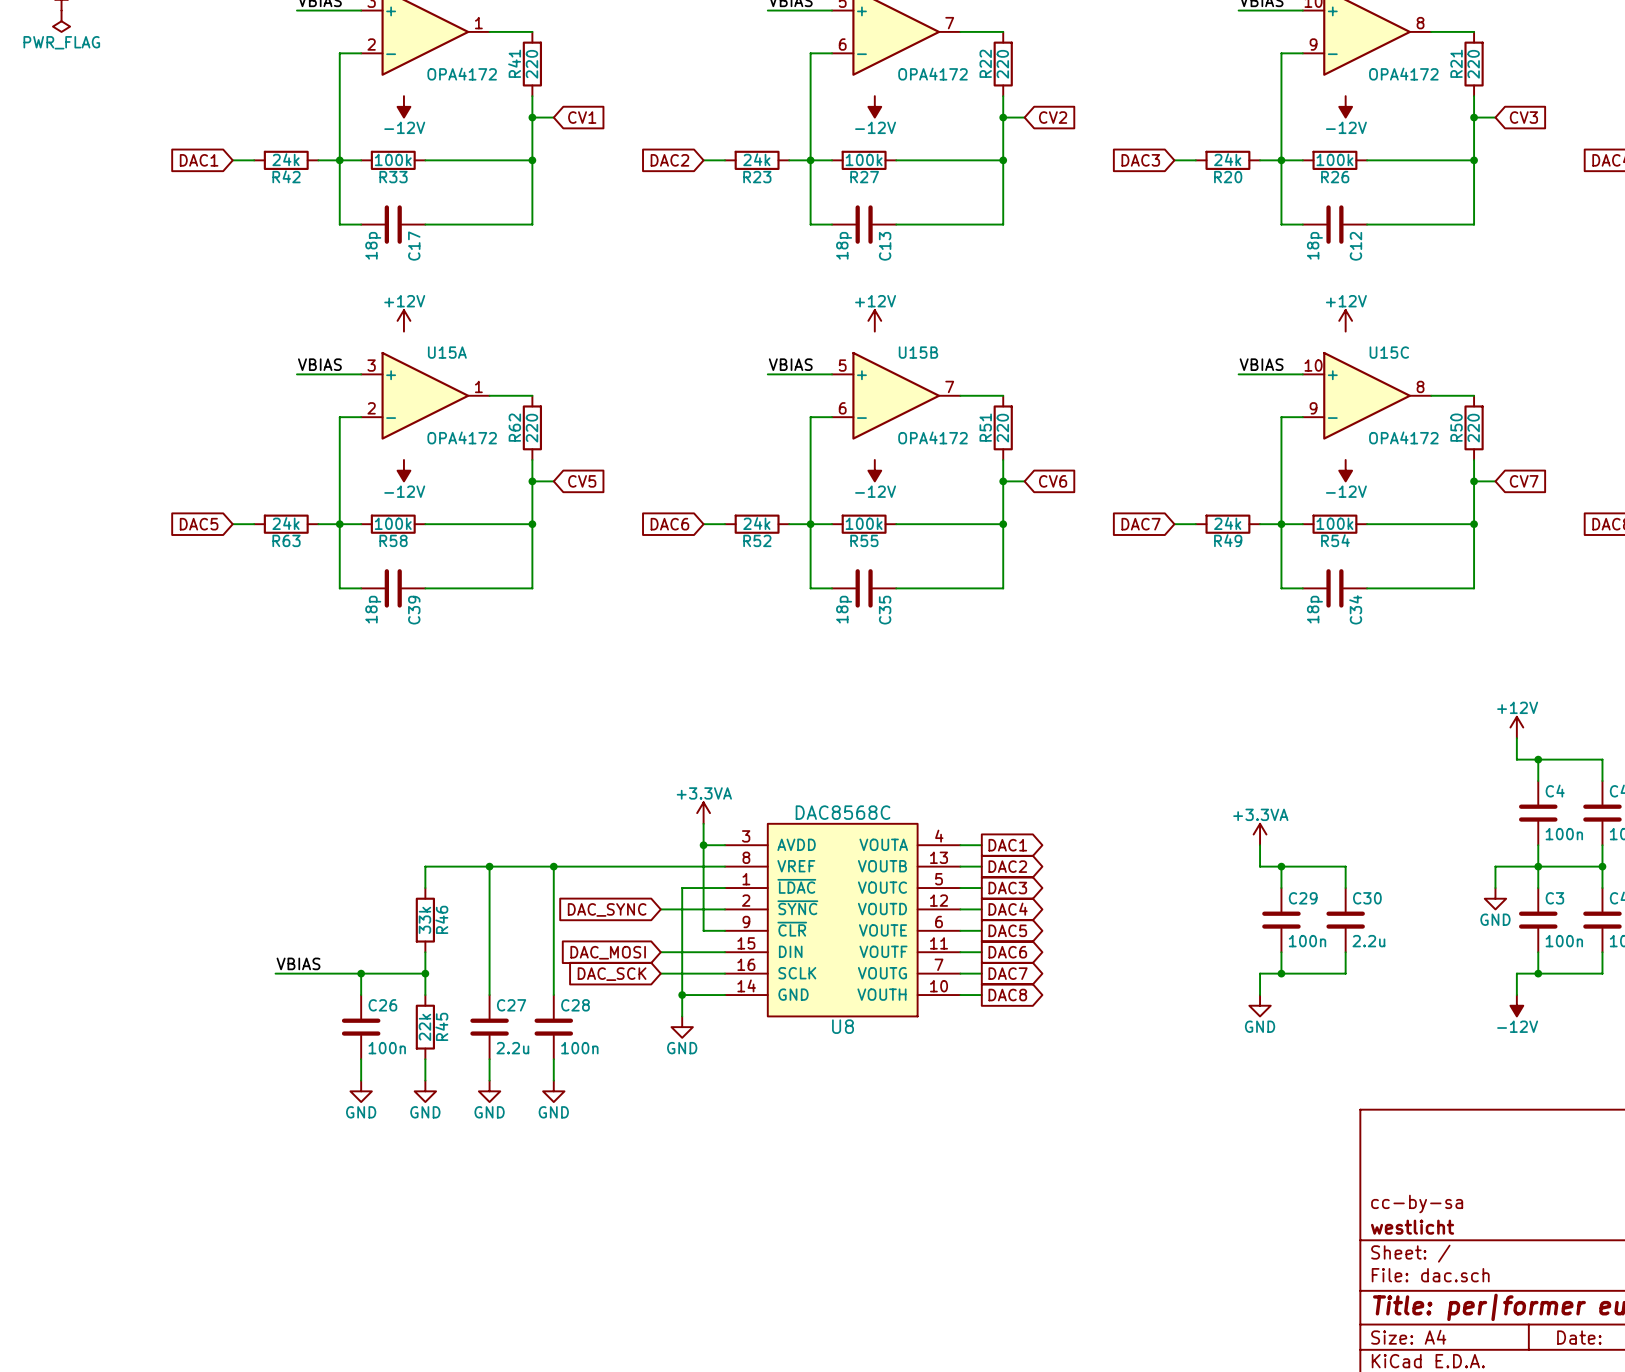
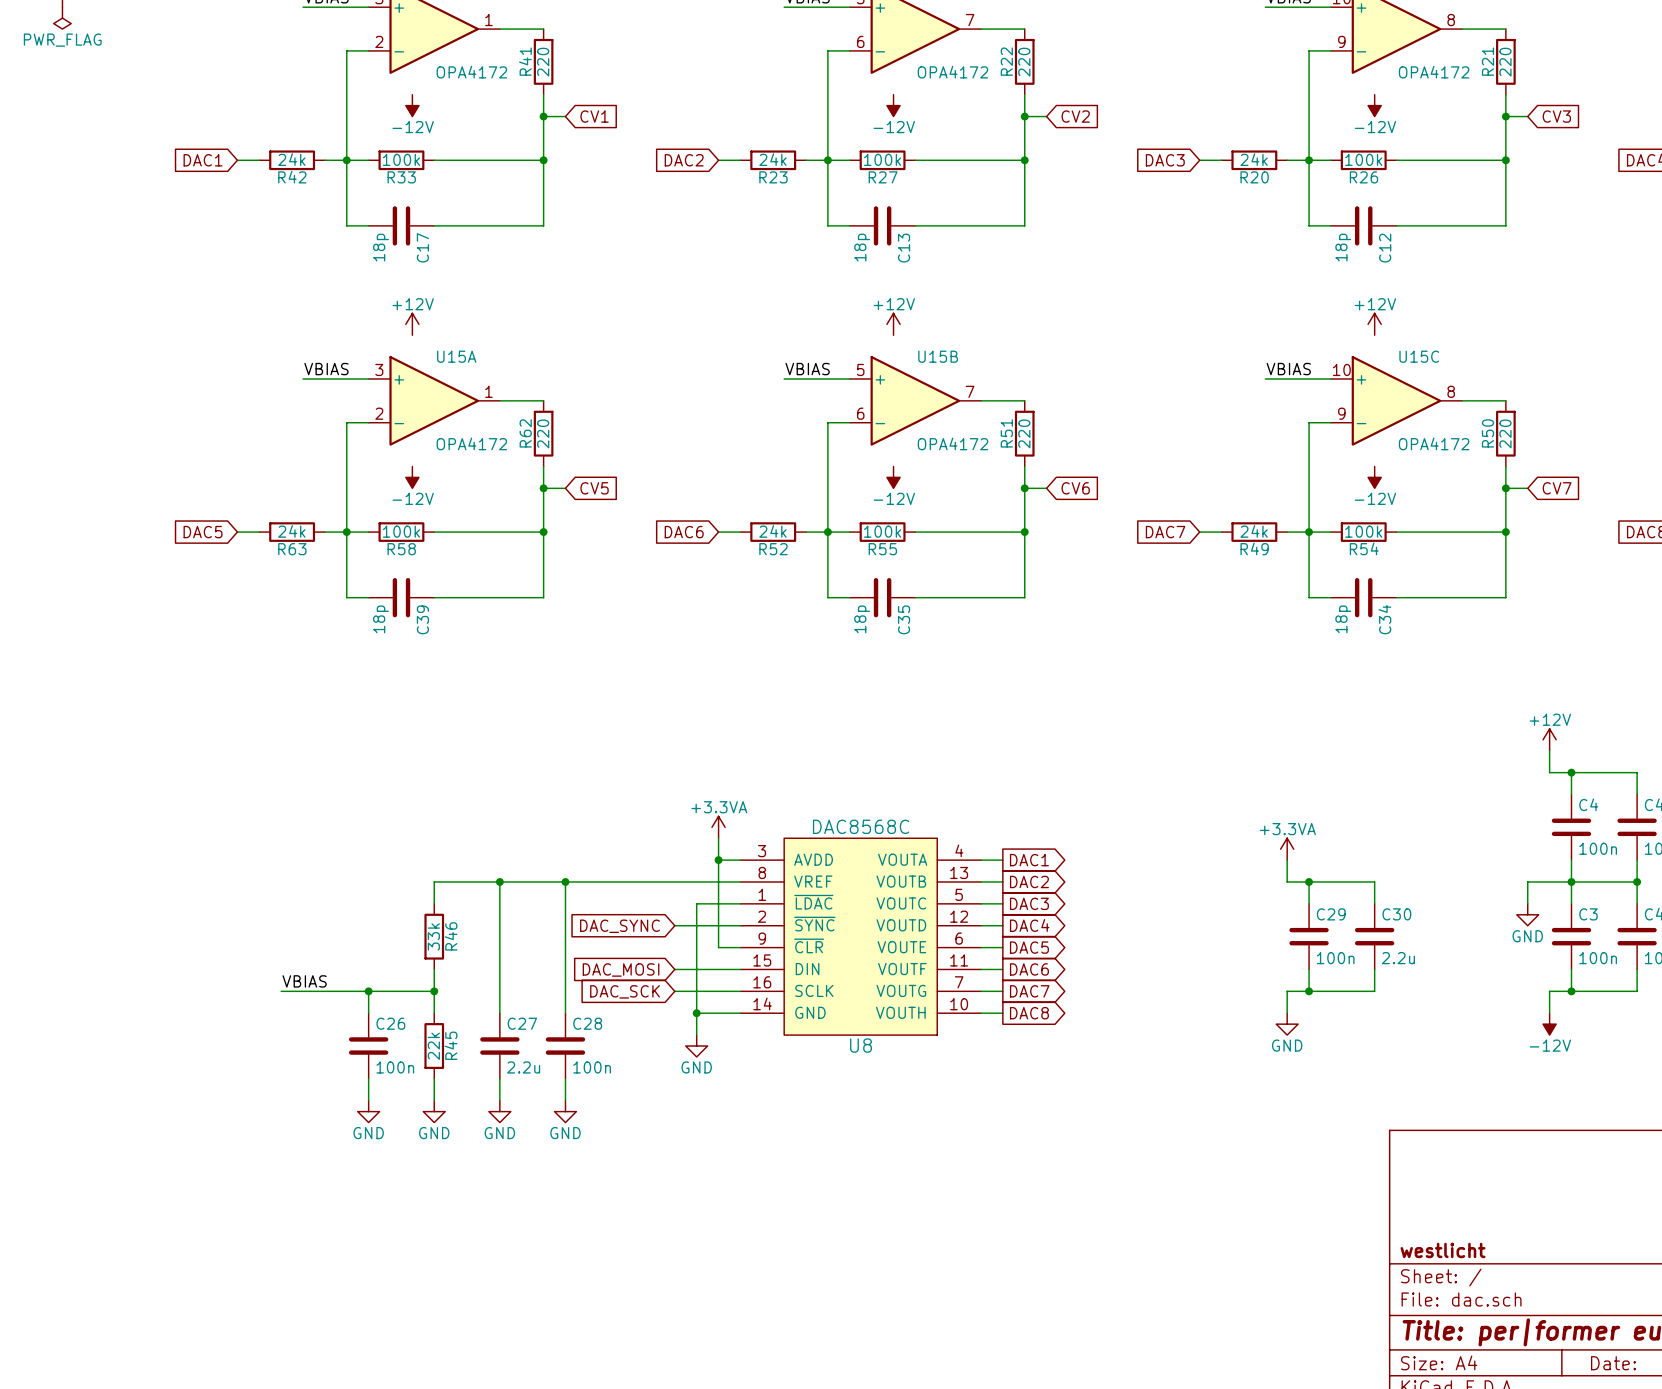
title block: cc-by-sa (1417, 1204) -> none

